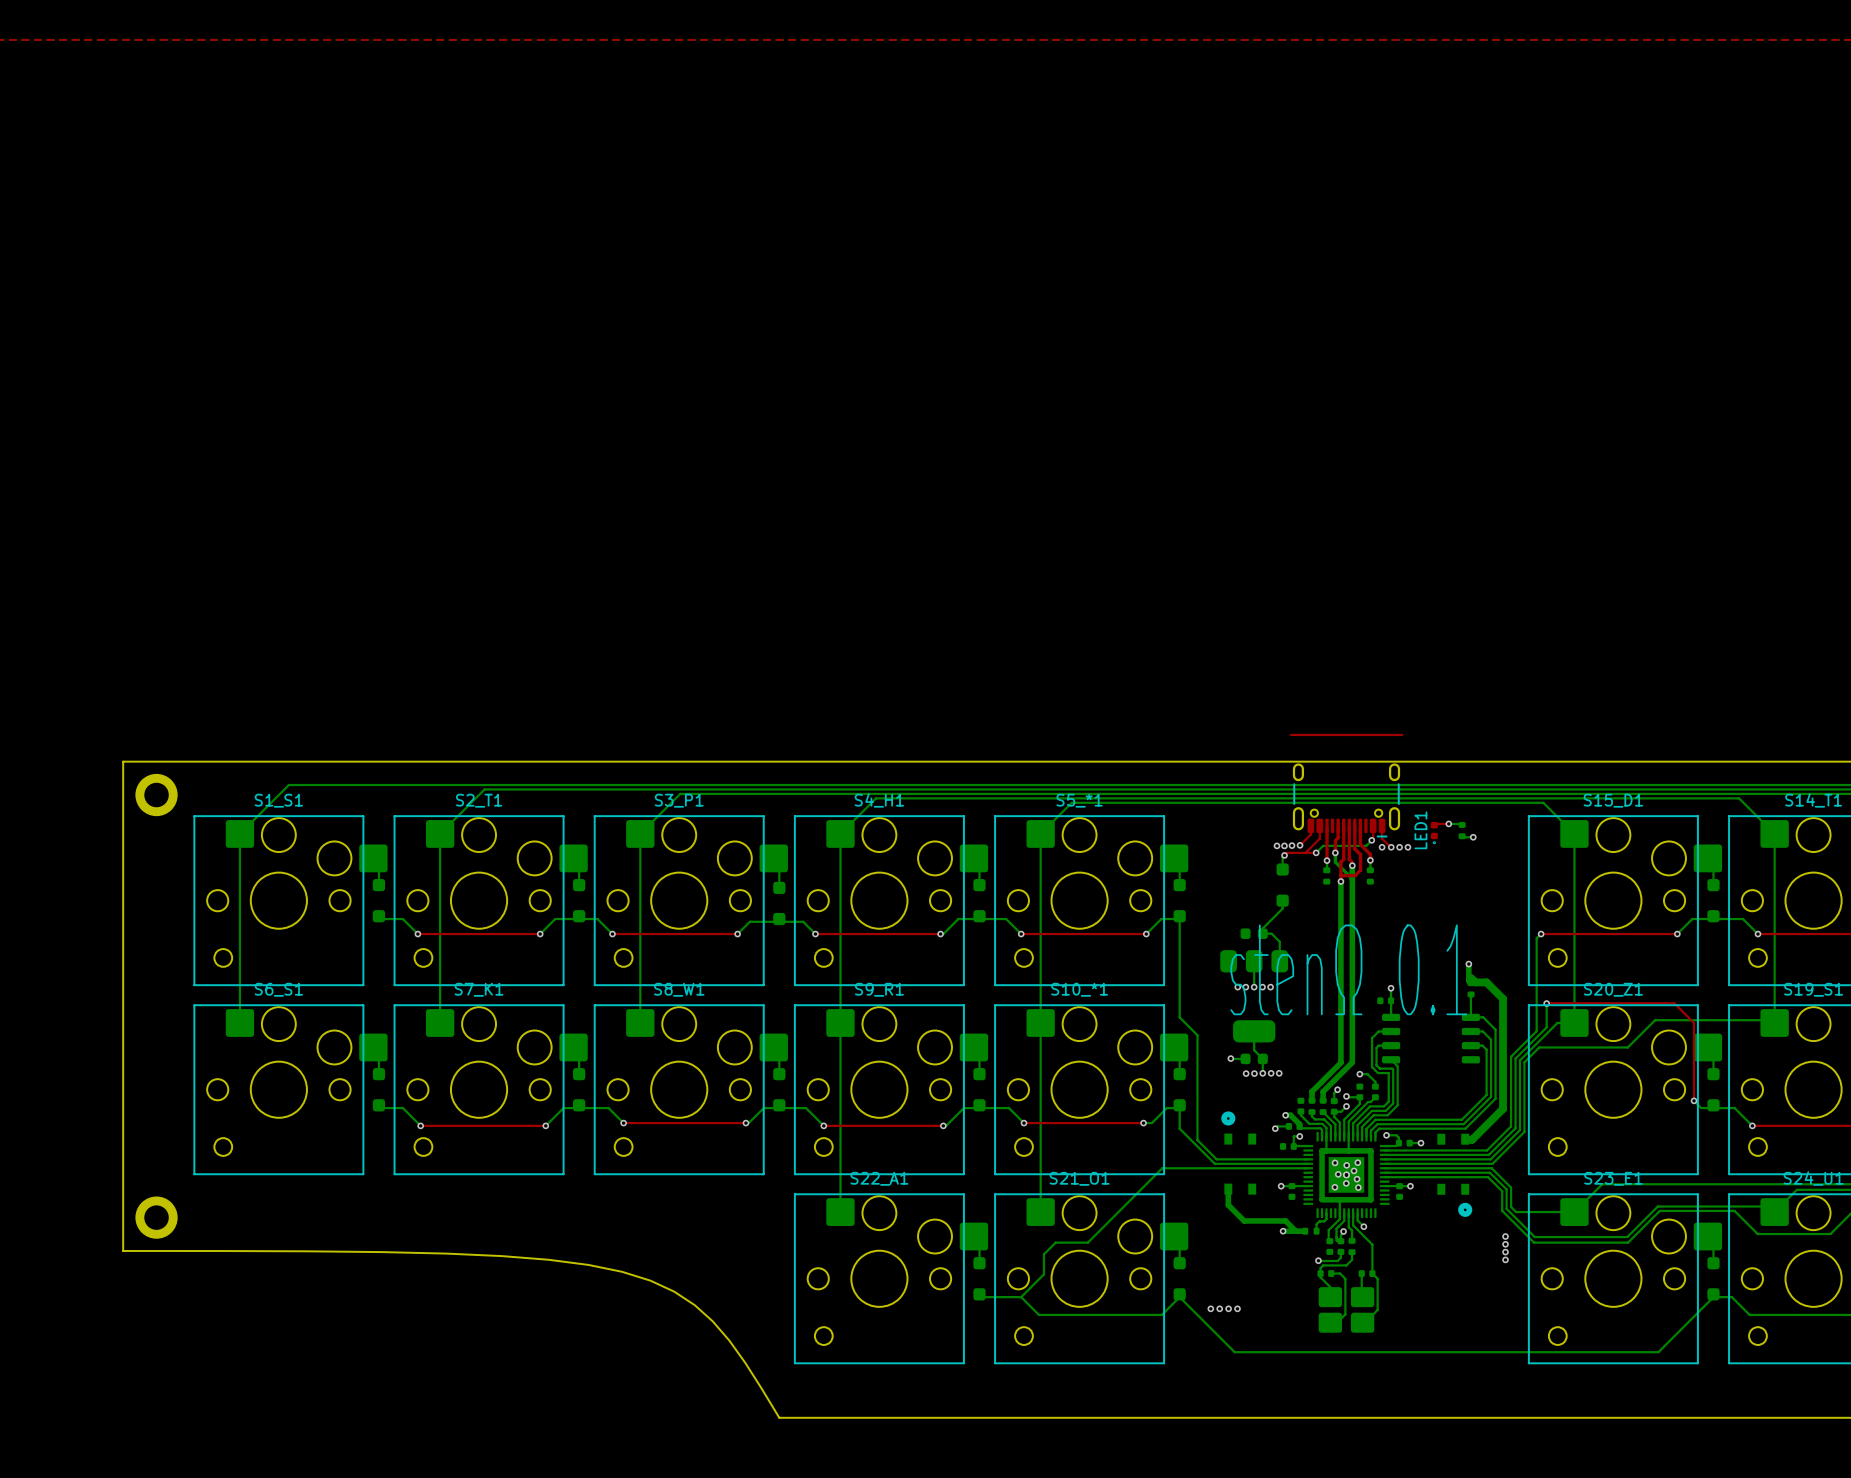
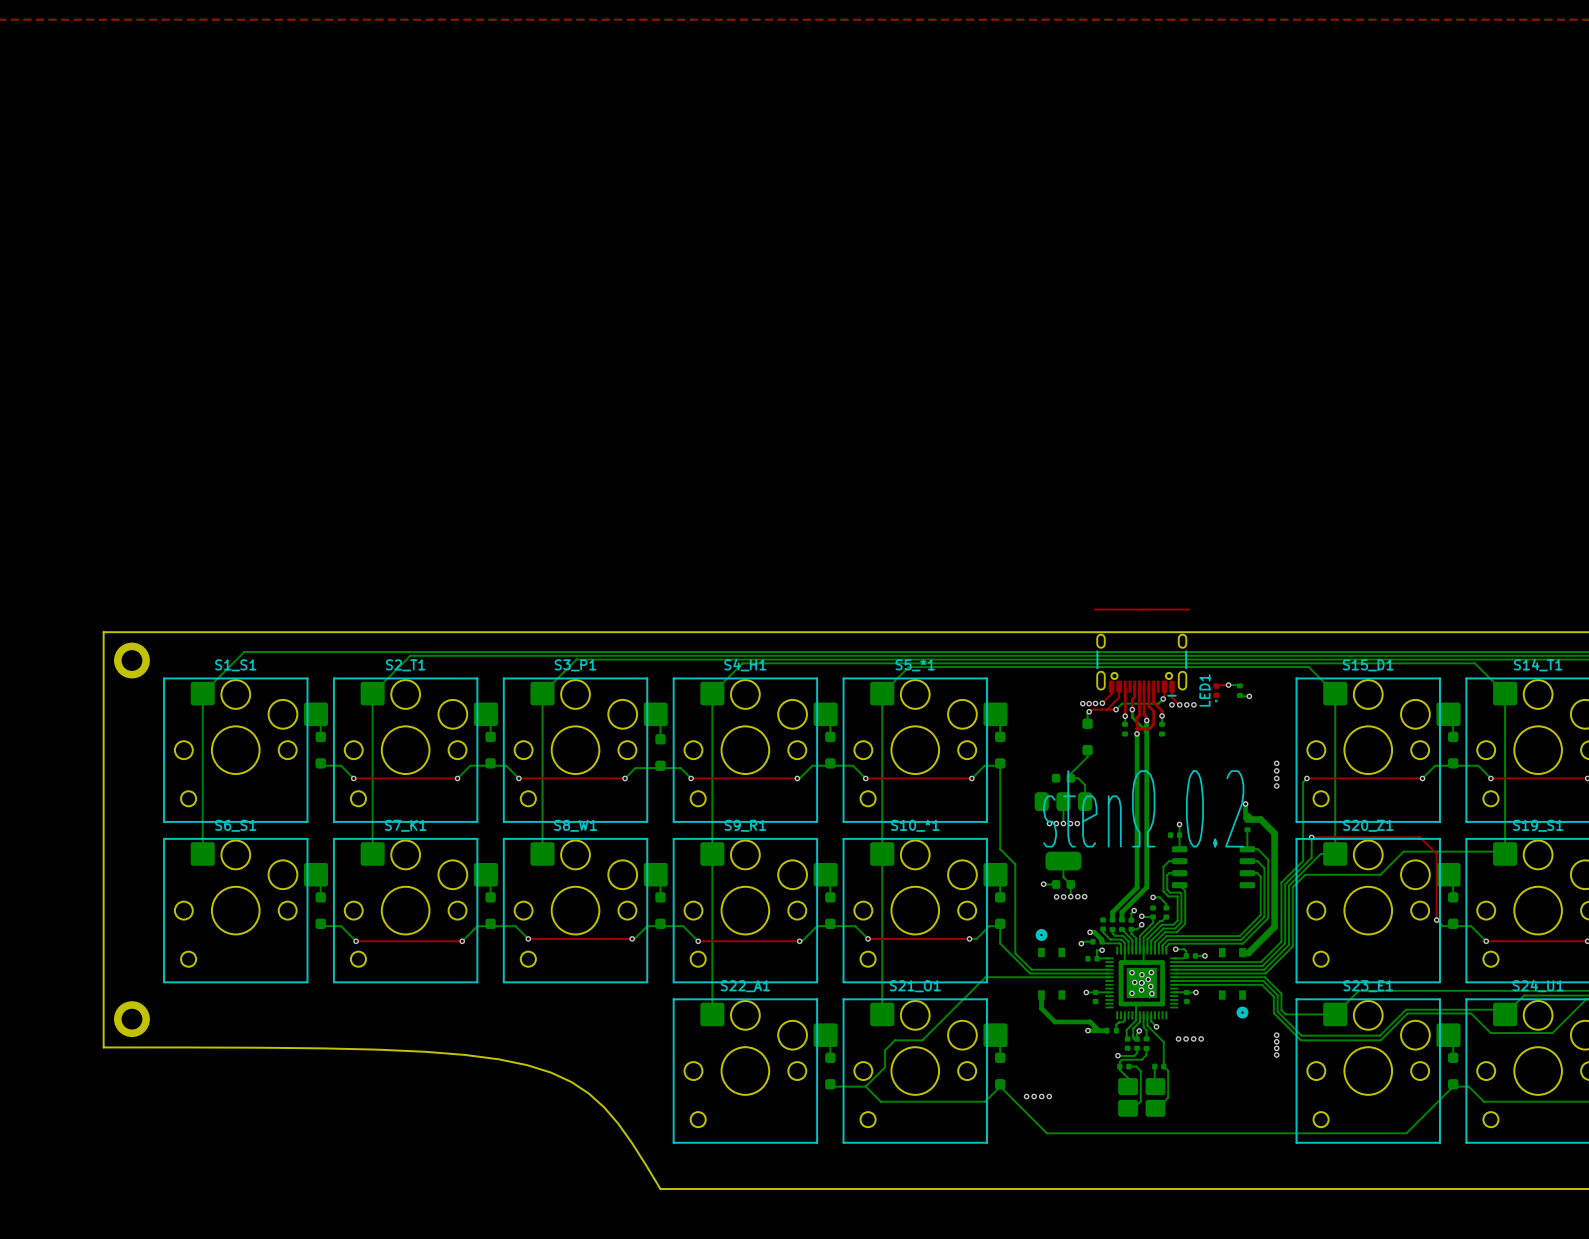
via: none -> (1276, 763)
via: none -> (1276, 770)
via: none -> (1276, 778)
via: none -> (1276, 786)
text: stenΩ 0.1 (1348, 969) -> stenΩ 0.2 (1143, 808)
via: none -> (1178, 1038)
via: none -> (1186, 1038)
via: none -> (1193, 1038)
via: none -> (1201, 1038)

